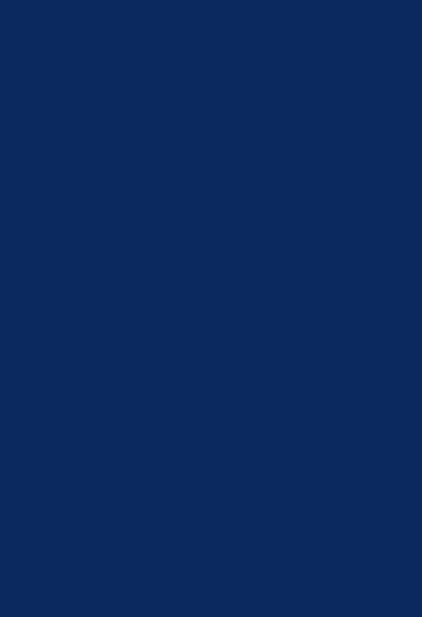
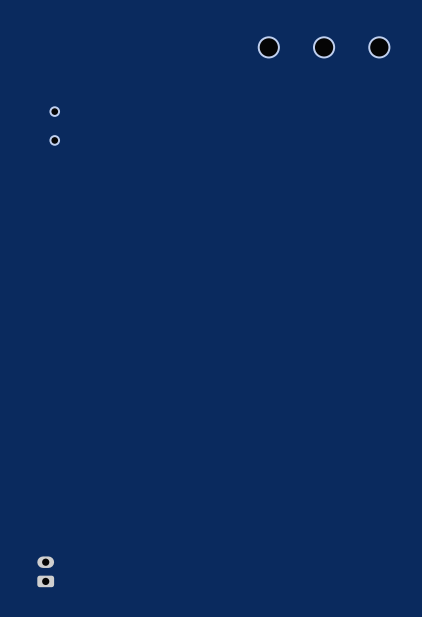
part: none -> (268, 47)
part: none -> (324, 47)
part: none -> (379, 47)
part: none -> (54, 126)
part: none -> (45, 571)

